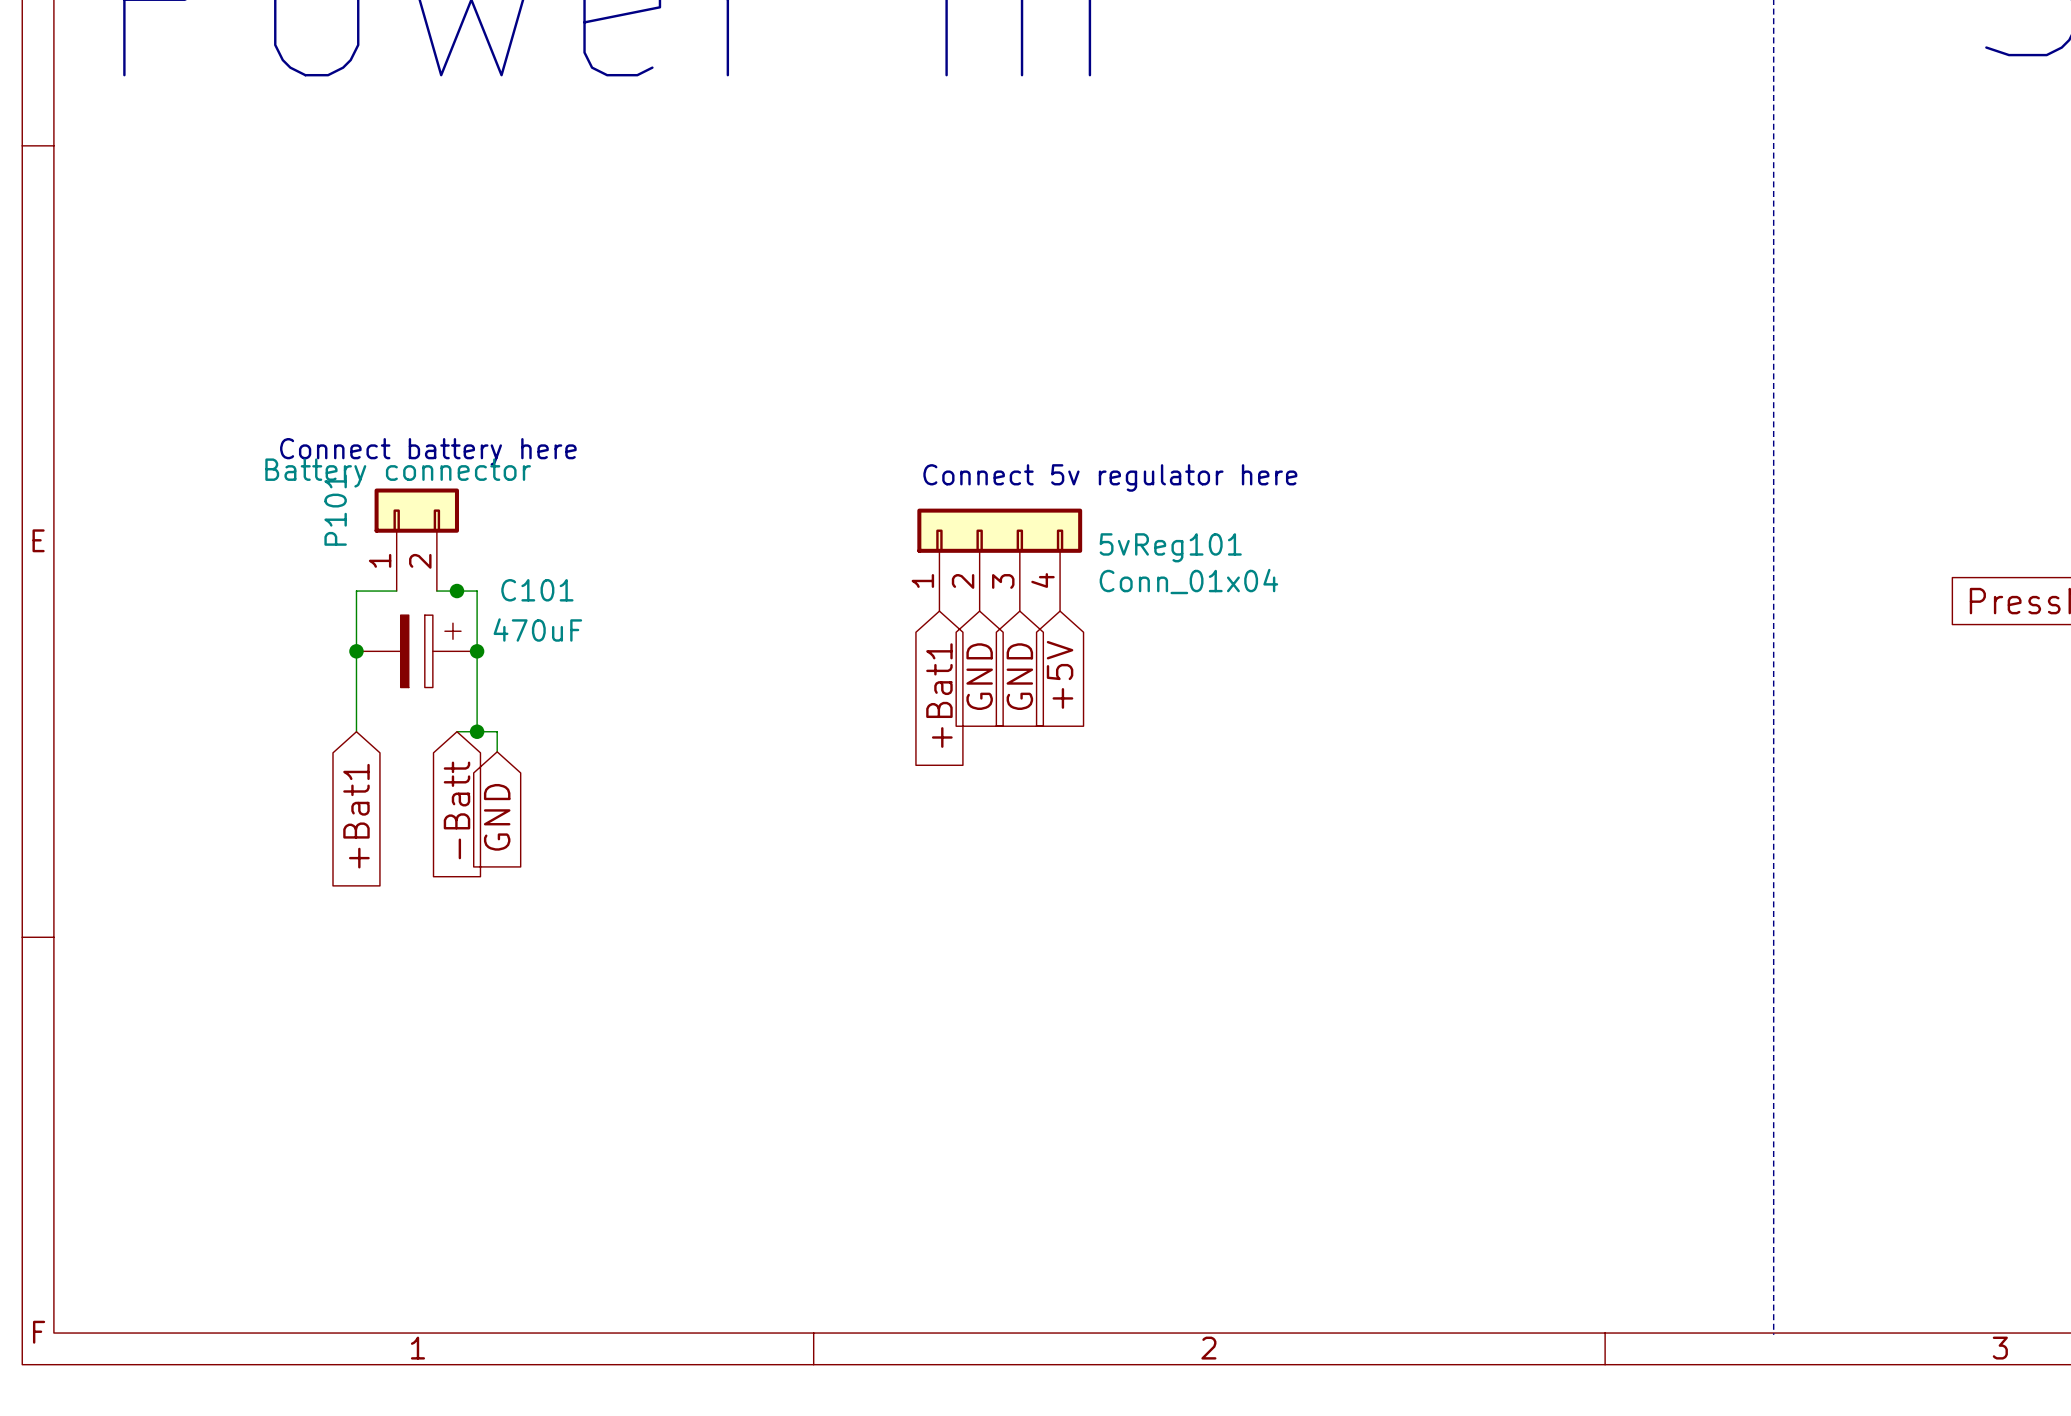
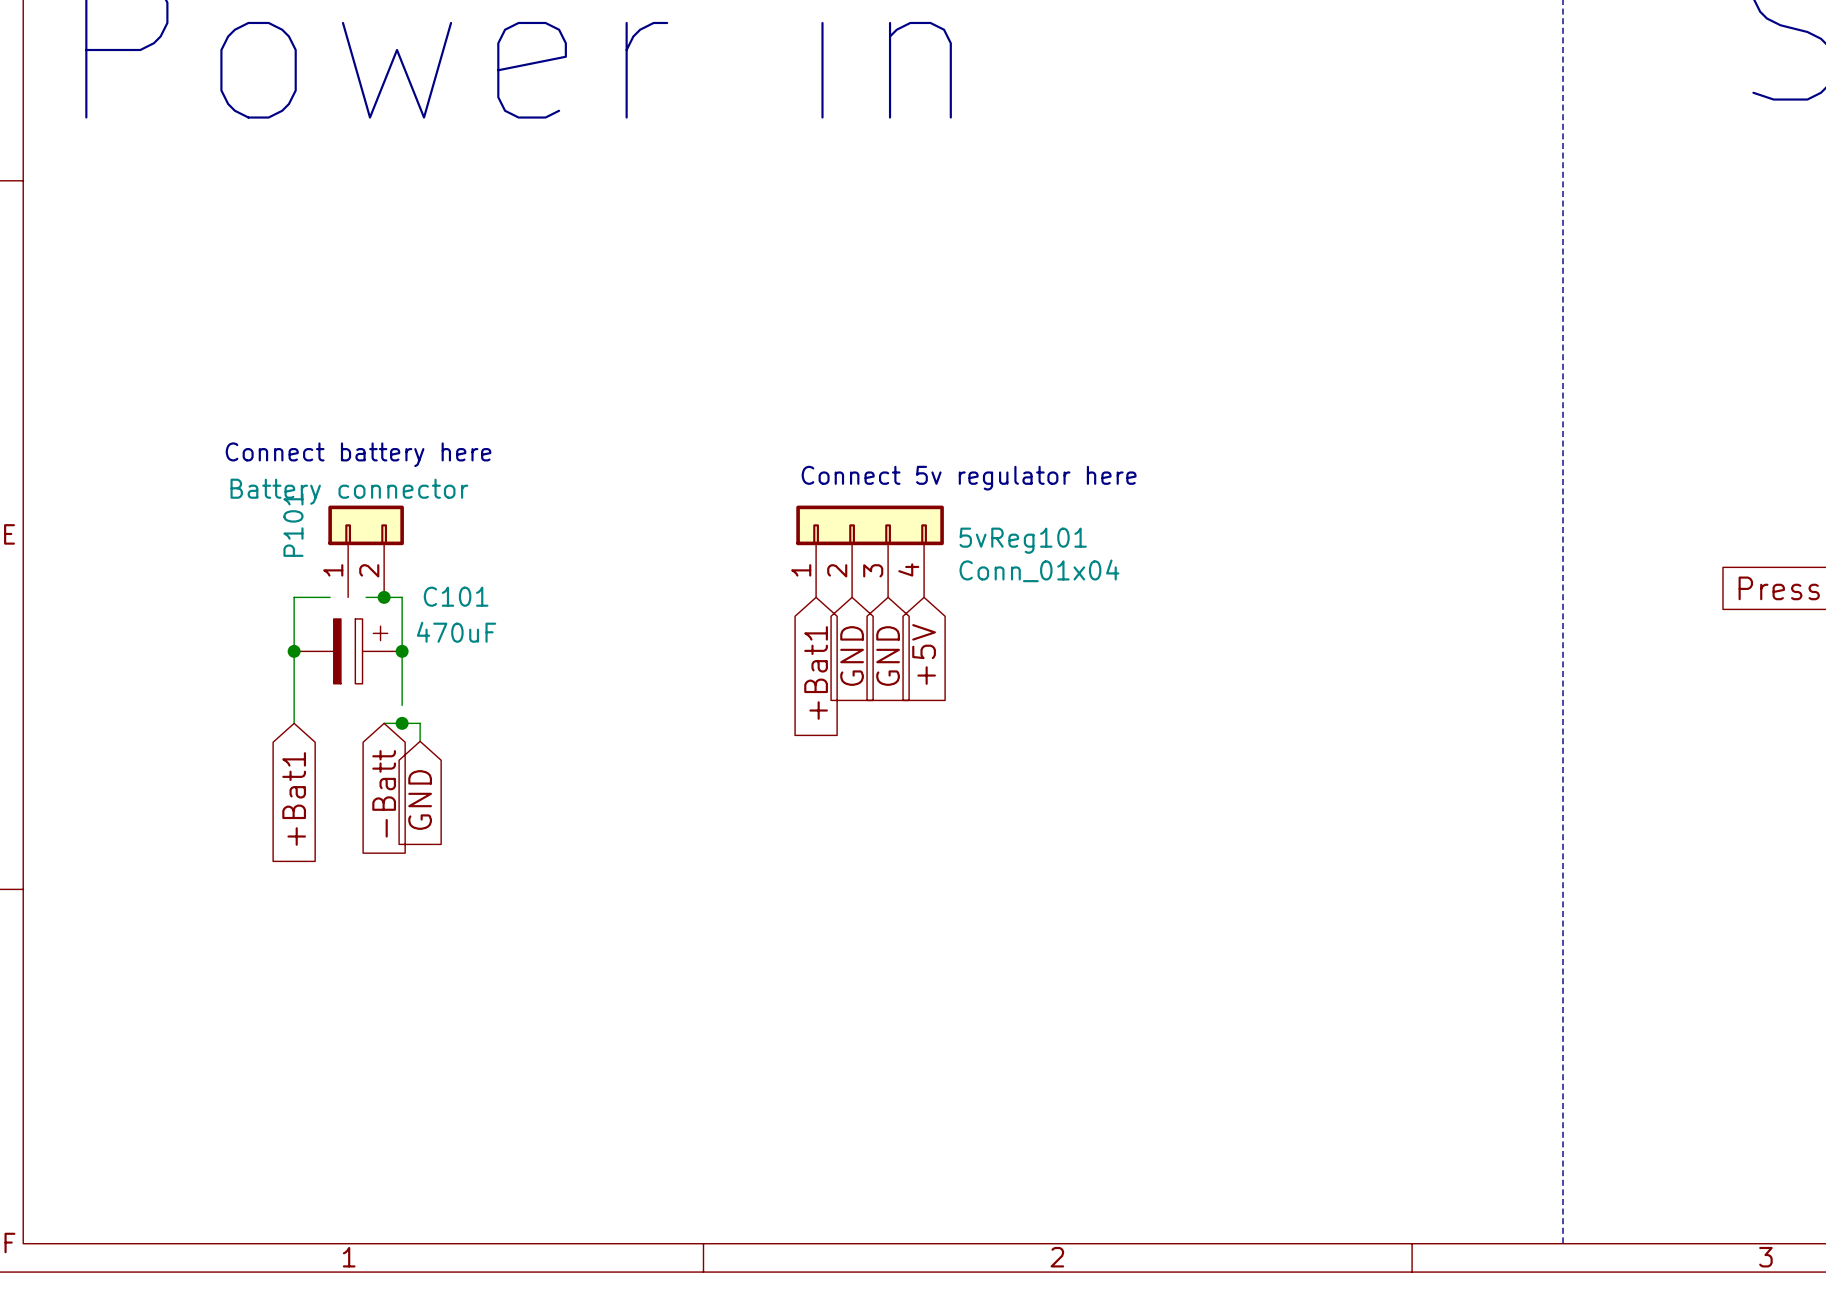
P101 position: (416, 539) -> (366, 551)
wire: (396, 591) (356, 591) (356, 611) -> (330, 597) (294, 597)
wire: (436, 591) (477, 591) (477, 611) -> (366, 597) (402, 597)
junction position: (456, 591) -> (384, 597)
junction position: (356, 651) -> (294, 651)
C101 position: (416, 651) -> (348, 651)
junction position: (477, 651) -> (402, 651)
wire: none -> (294, 705) (294, 723)
wire: (456, 731) (497, 731) (497, 751) -> (384, 723) (420, 723) (420, 741)
junction position: (477, 731) -> (402, 723)
global label position: -Batt (456, 810) -> -Batt (384, 793)
global label position: +Bat1 (356, 816) -> +Bat1 (294, 798)
global label position: GND (497, 817) -> GND (420, 799)

